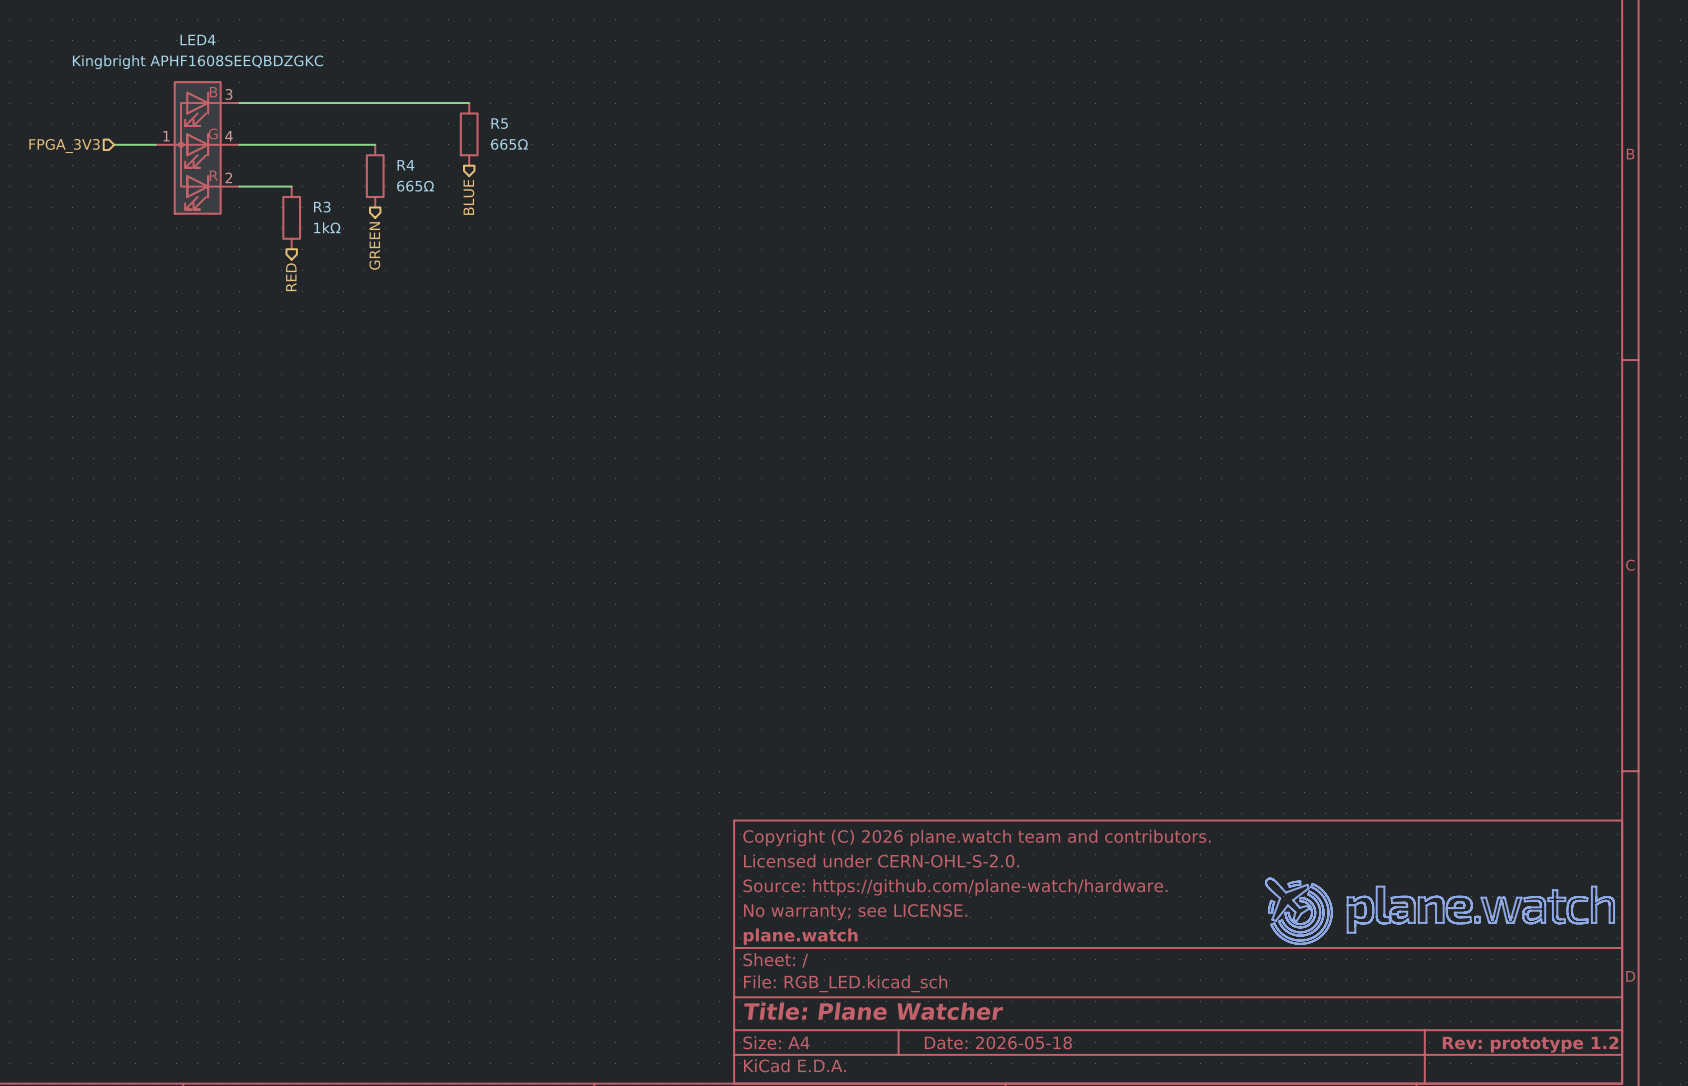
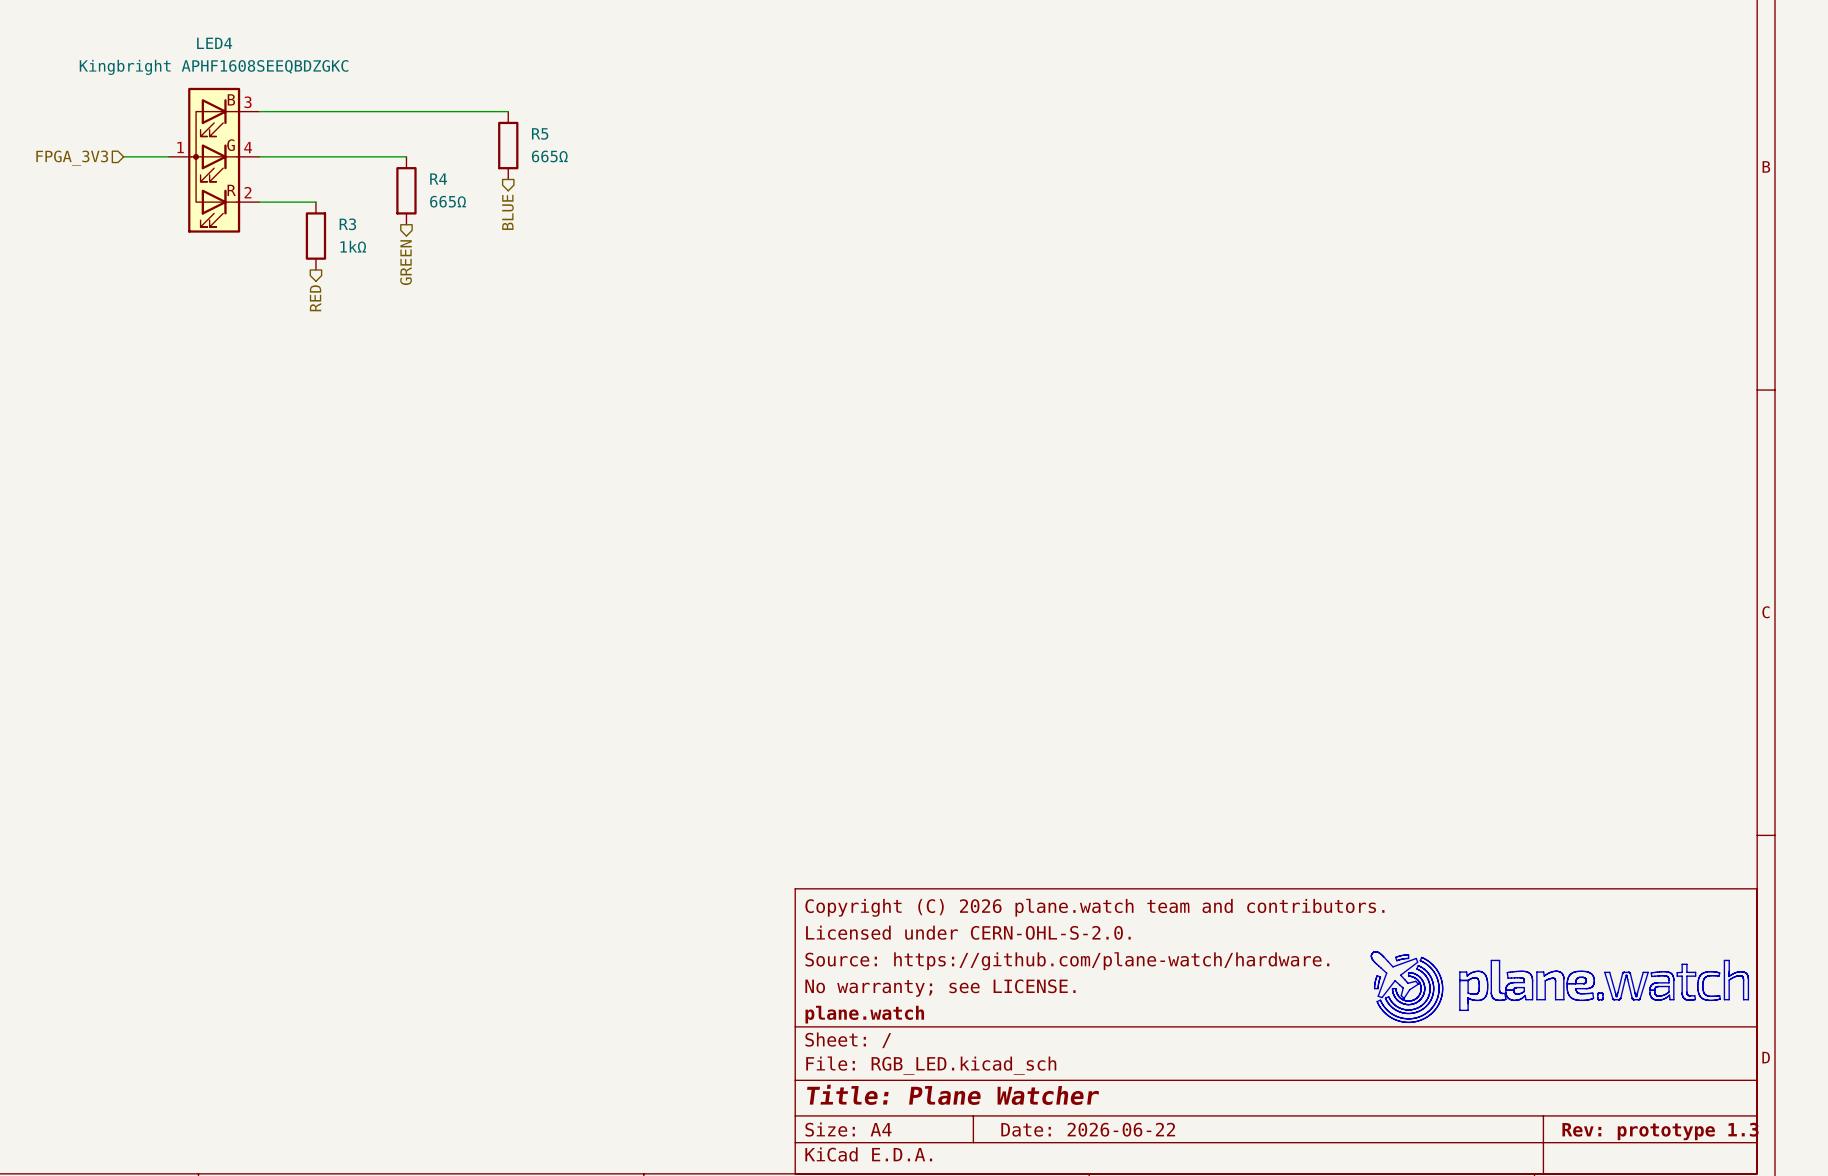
title block: Date: 2026-05-18 (998, 1042) -> Date: 2026-06-22 (1088, 1129)
title block: Rev: prototype 1.2 (1530, 1044) -> Rev: prototype 1.3 (1660, 1131)

